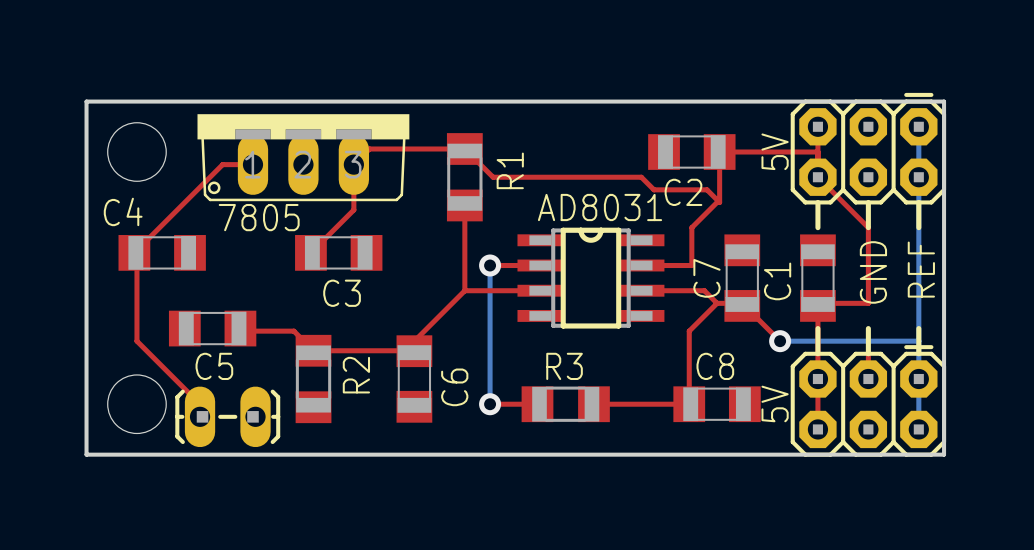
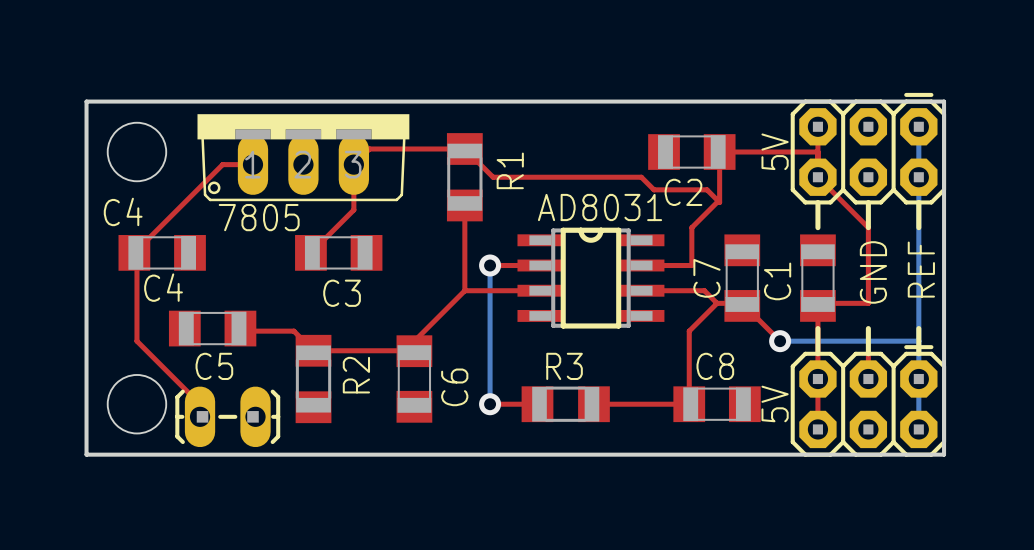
text: none -> C4 (163, 287)

